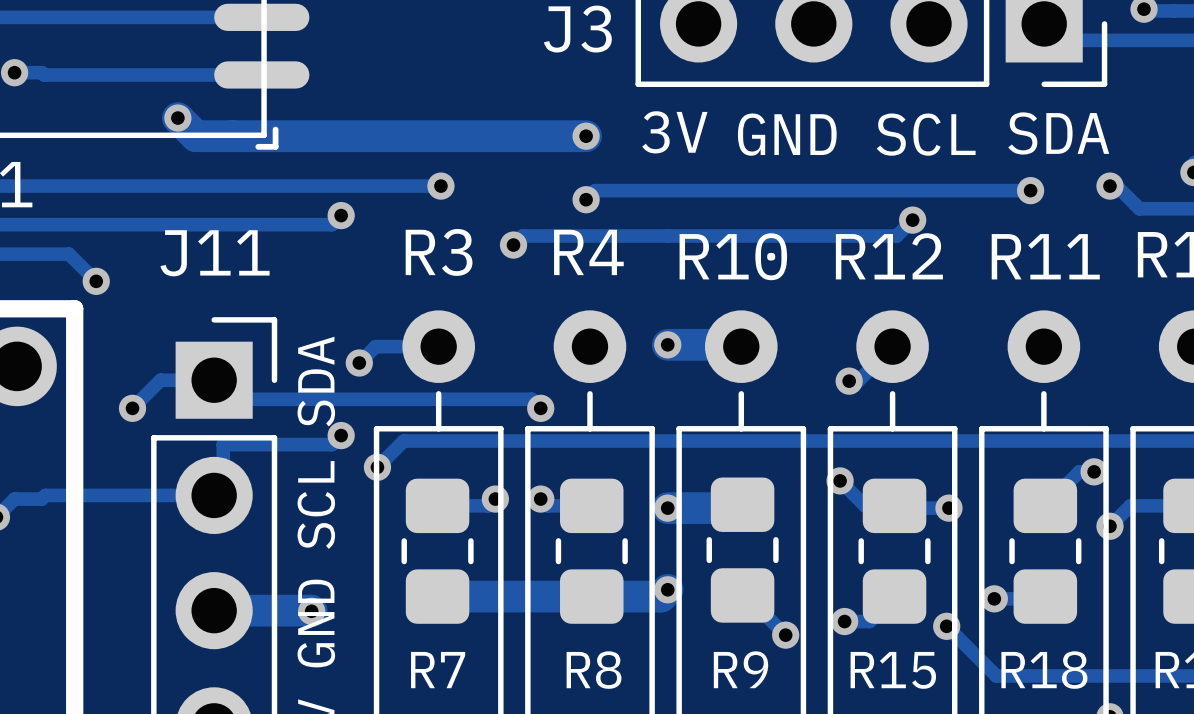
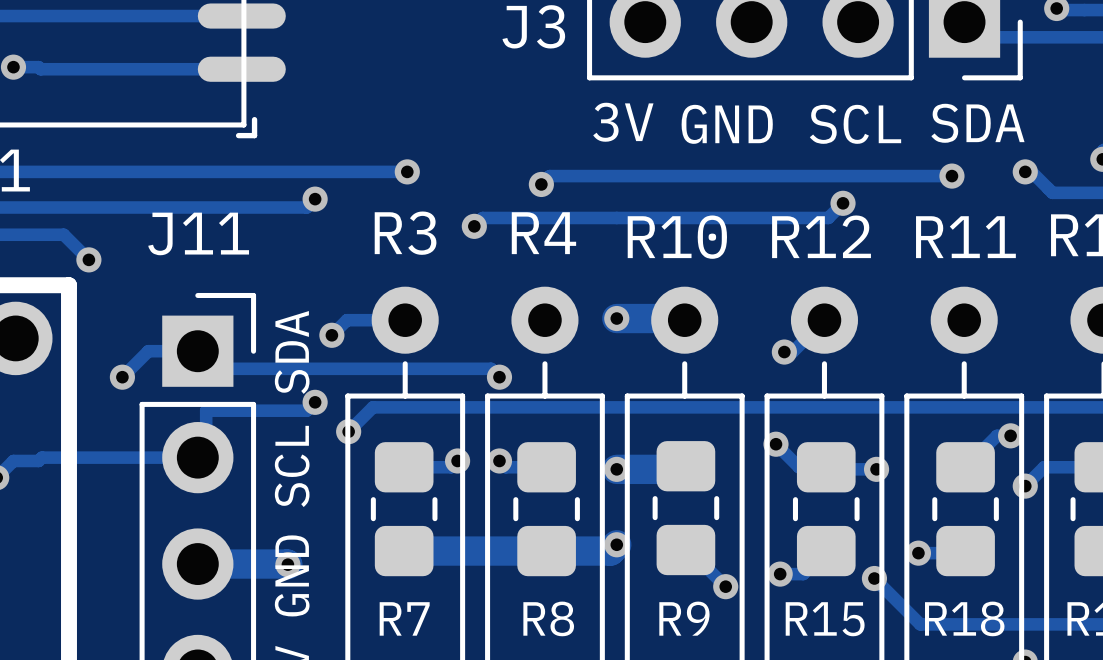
track: (177, 118) (196, 136) (586, 136) -> none
via: (177, 118) -> none
via: (586, 136) -> none

